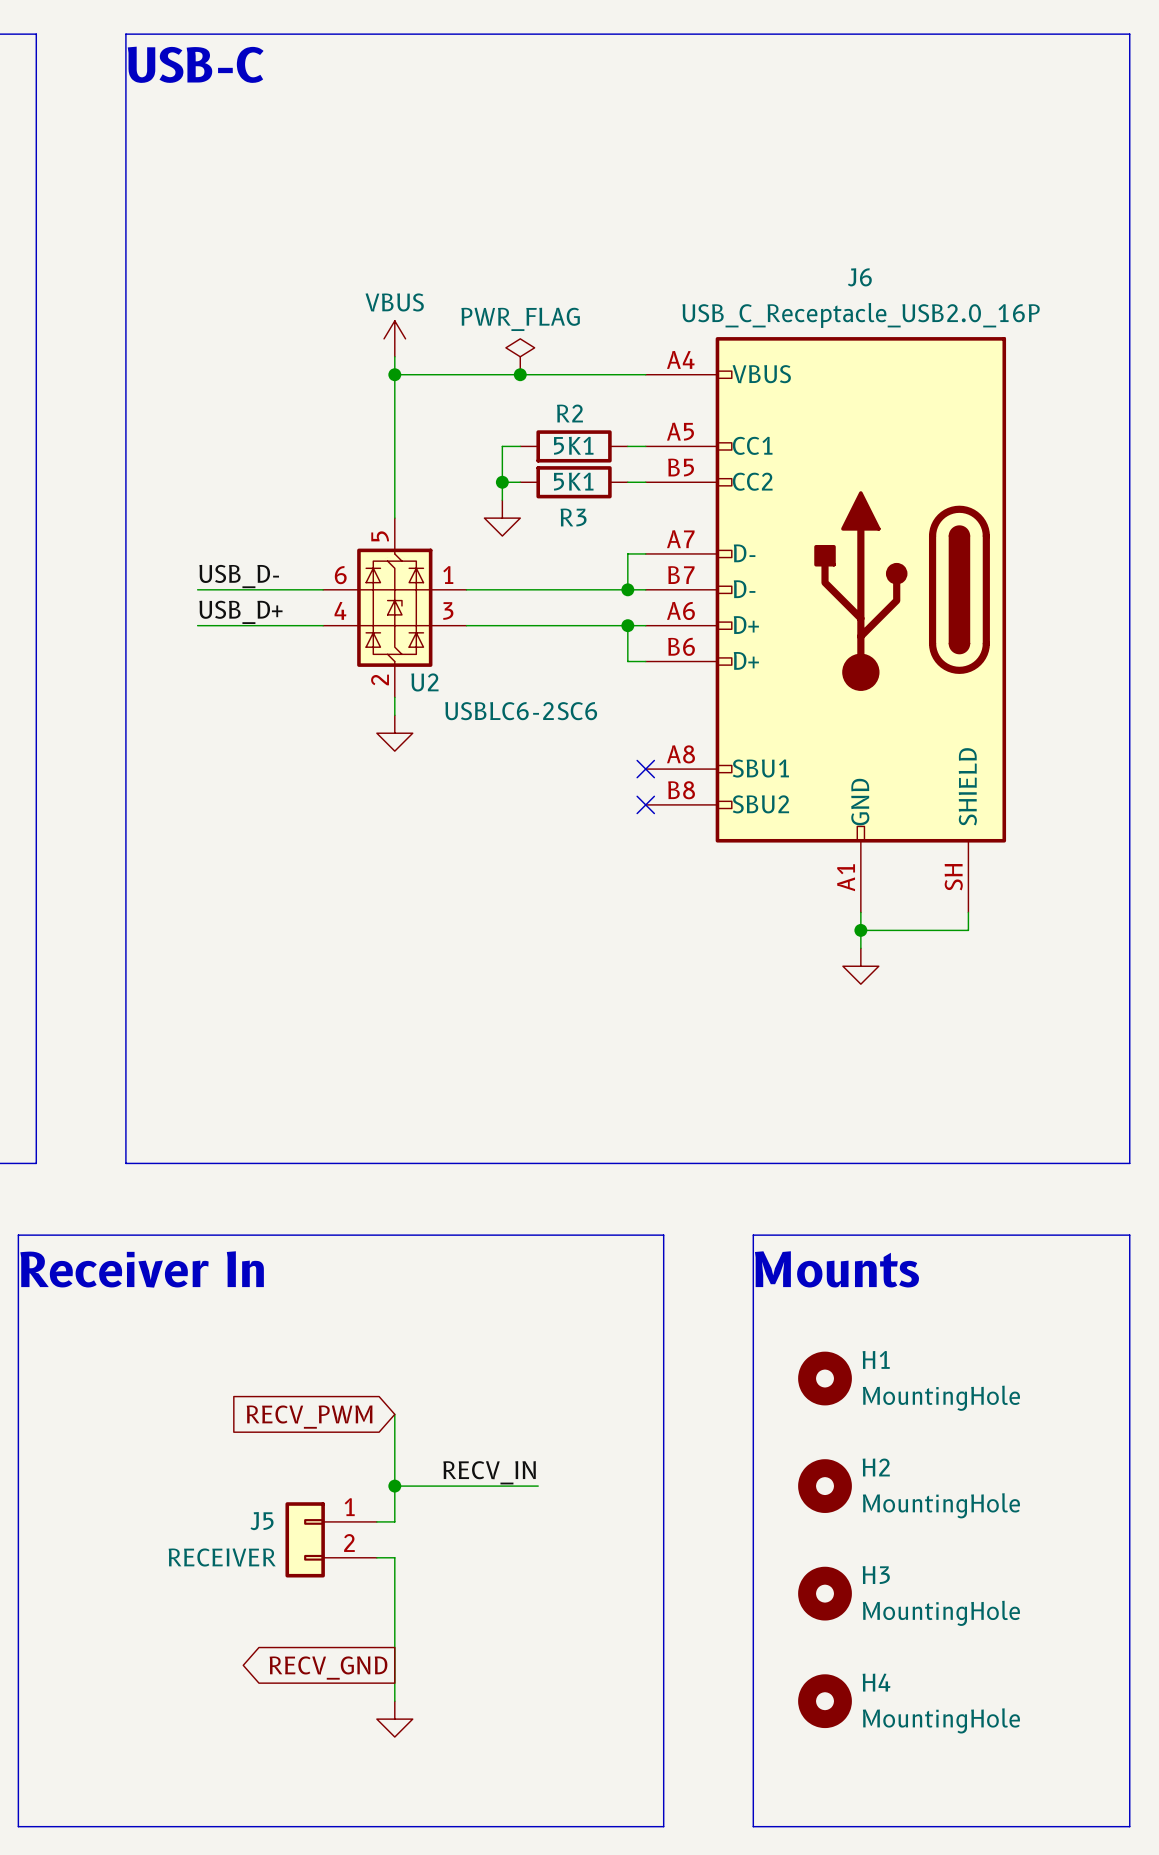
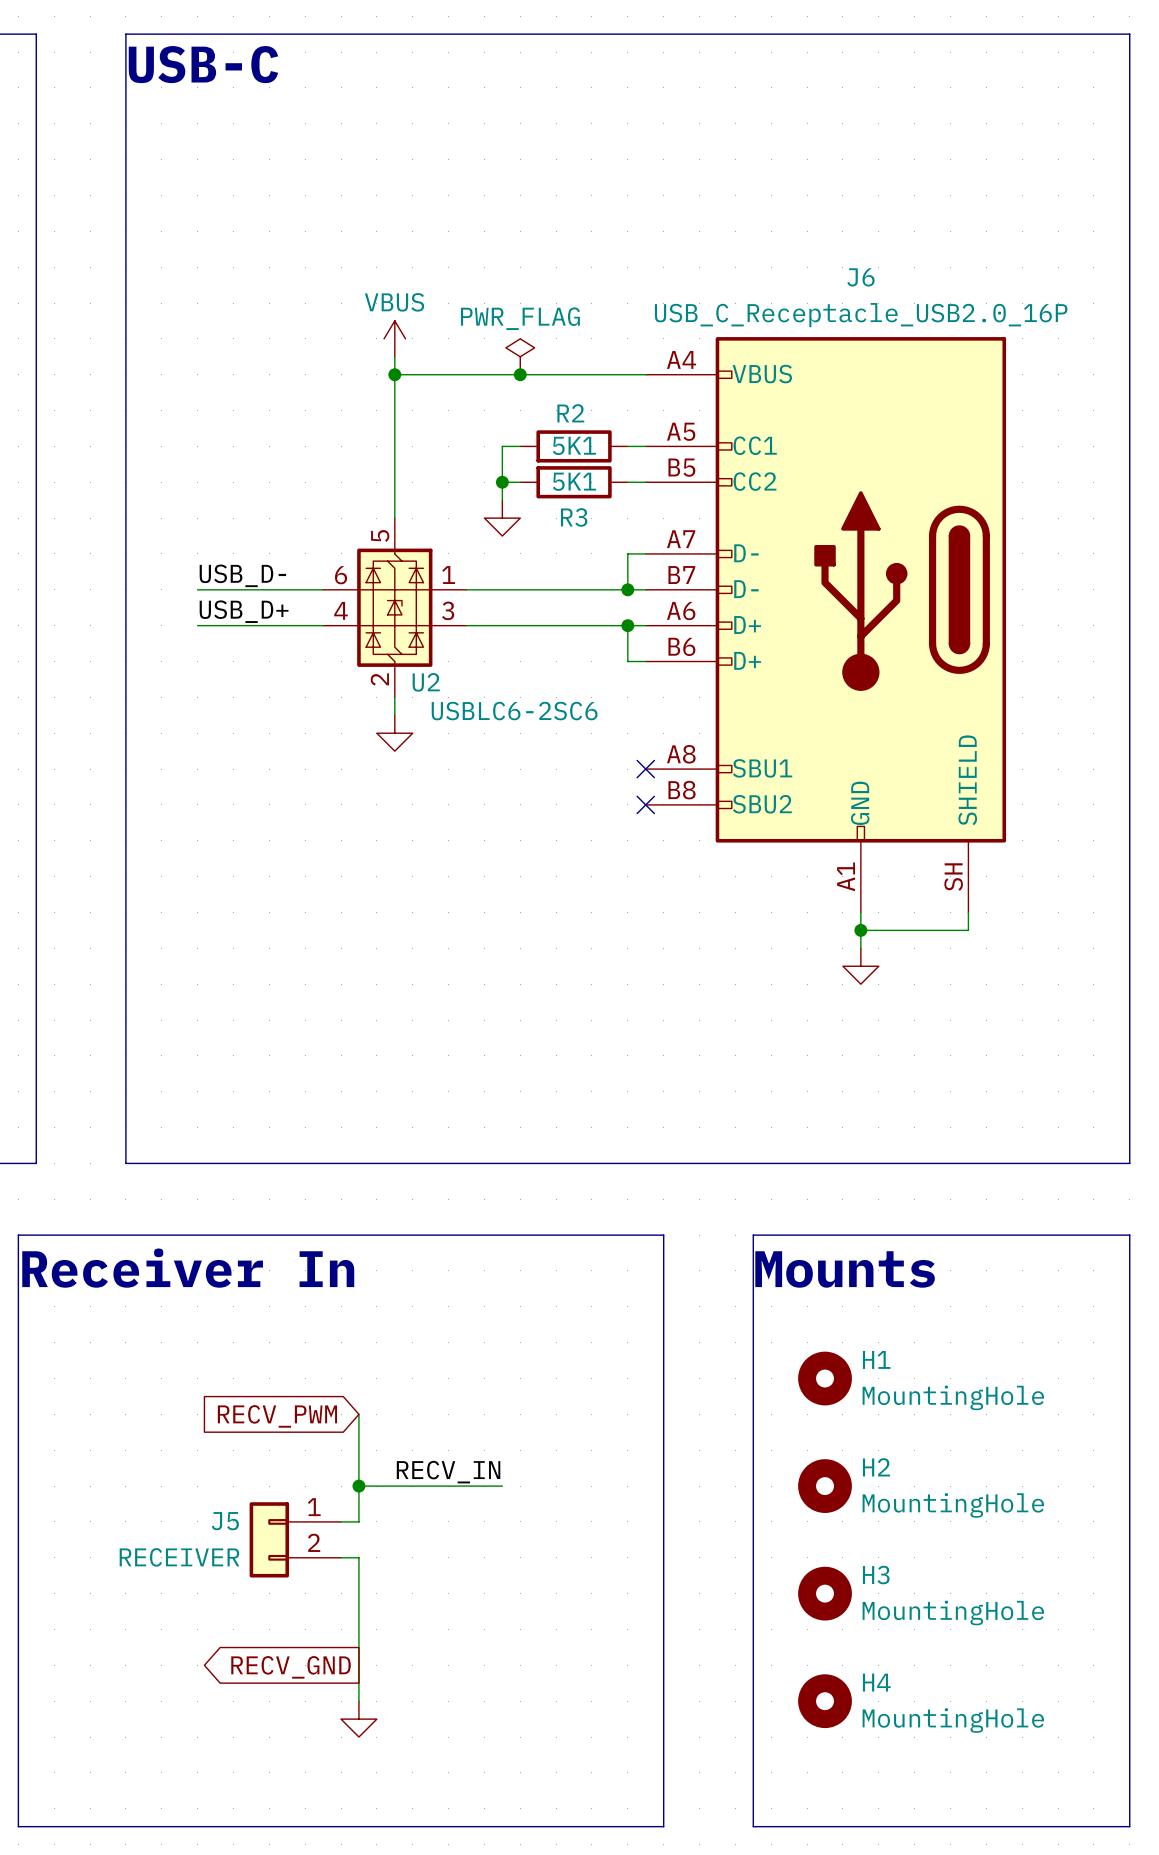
wire: (394, 1414) (394, 1521) (376, 1521) -> (358, 1414) (358, 1521) (341, 1521)
global label position: RECV_PWM (309, 1417) -> RECV_PWM (277, 1416)
label position: RECV_IN (489, 1472) -> RECV_IN (448, 1472)
junction position: (394, 1486) -> (358, 1486)
wire: (502, 1486) (538, 1486) -> (358, 1486) (394, 1486)
J5 position: (331, 1539) -> (295, 1539)
wire: (376, 1557) (394, 1557) (394, 1701) -> (341, 1557) (358, 1557) (358, 1701)
global label position: RECV_GND (328, 1668) -> RECV_GND (291, 1667)
power symbol position: (394, 1719) -> (358, 1719)

